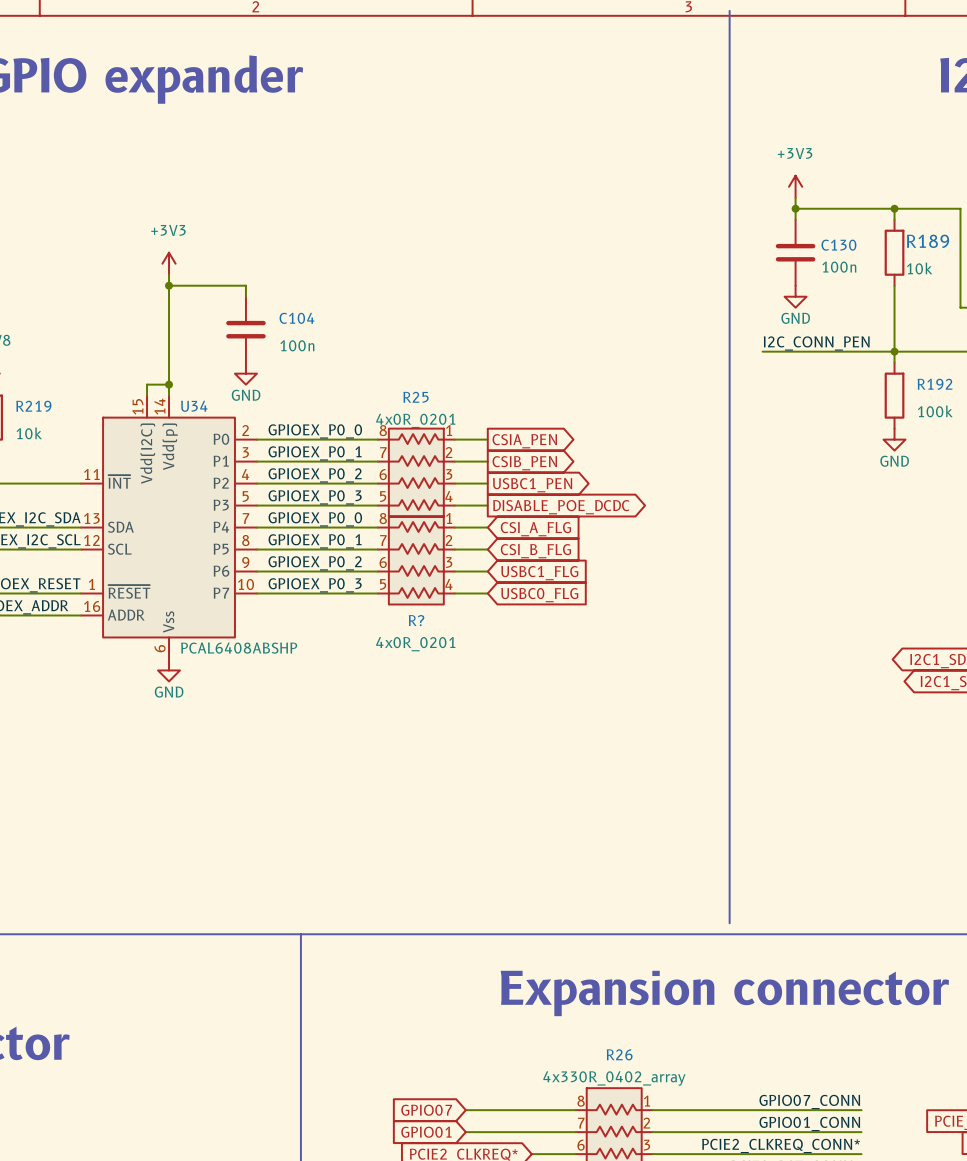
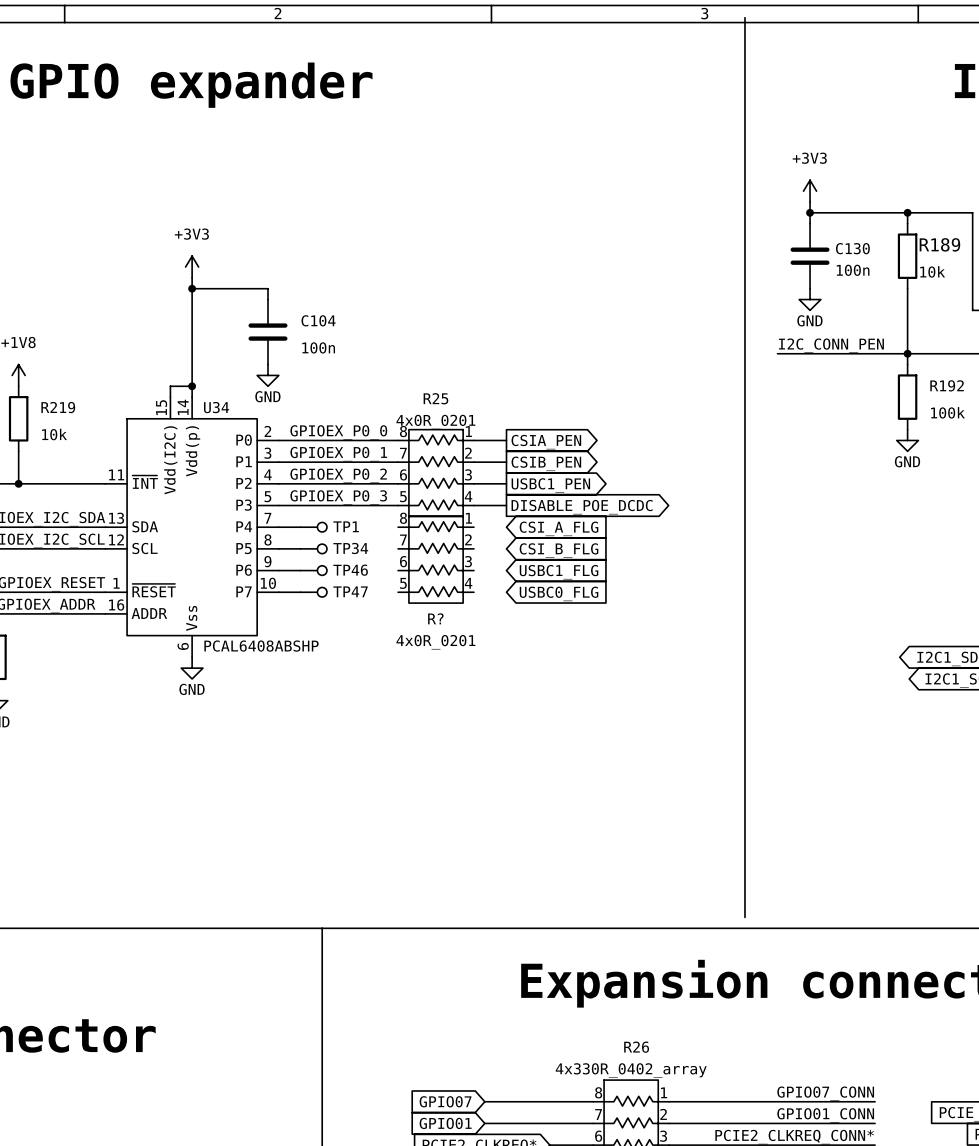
label: GPIOEX_P0_0 (315, 519) -> none
wire: (278, 527) (377, 527) -> none
TP1: none -> (313, 527)
wire: (454, 527) (487, 527) -> none
label: GPIOEX_P0_1 (315, 541) -> none
wire: (278, 549) (377, 549) -> none
TP34: none -> (313, 548)
wire: (454, 549) (487, 549) -> none
label: GPIOEX_P0_2 (315, 563) -> none
wire: (278, 571) (377, 571) -> none
TP46: none -> (313, 570)
wire: (454, 571) (487, 571) -> none
label: GPIOEX_P0_3 (315, 585) -> none
wire: (278, 593) (377, 593) -> none
TP47: none -> (313, 592)
wire: (454, 593) (487, 593) -> none

